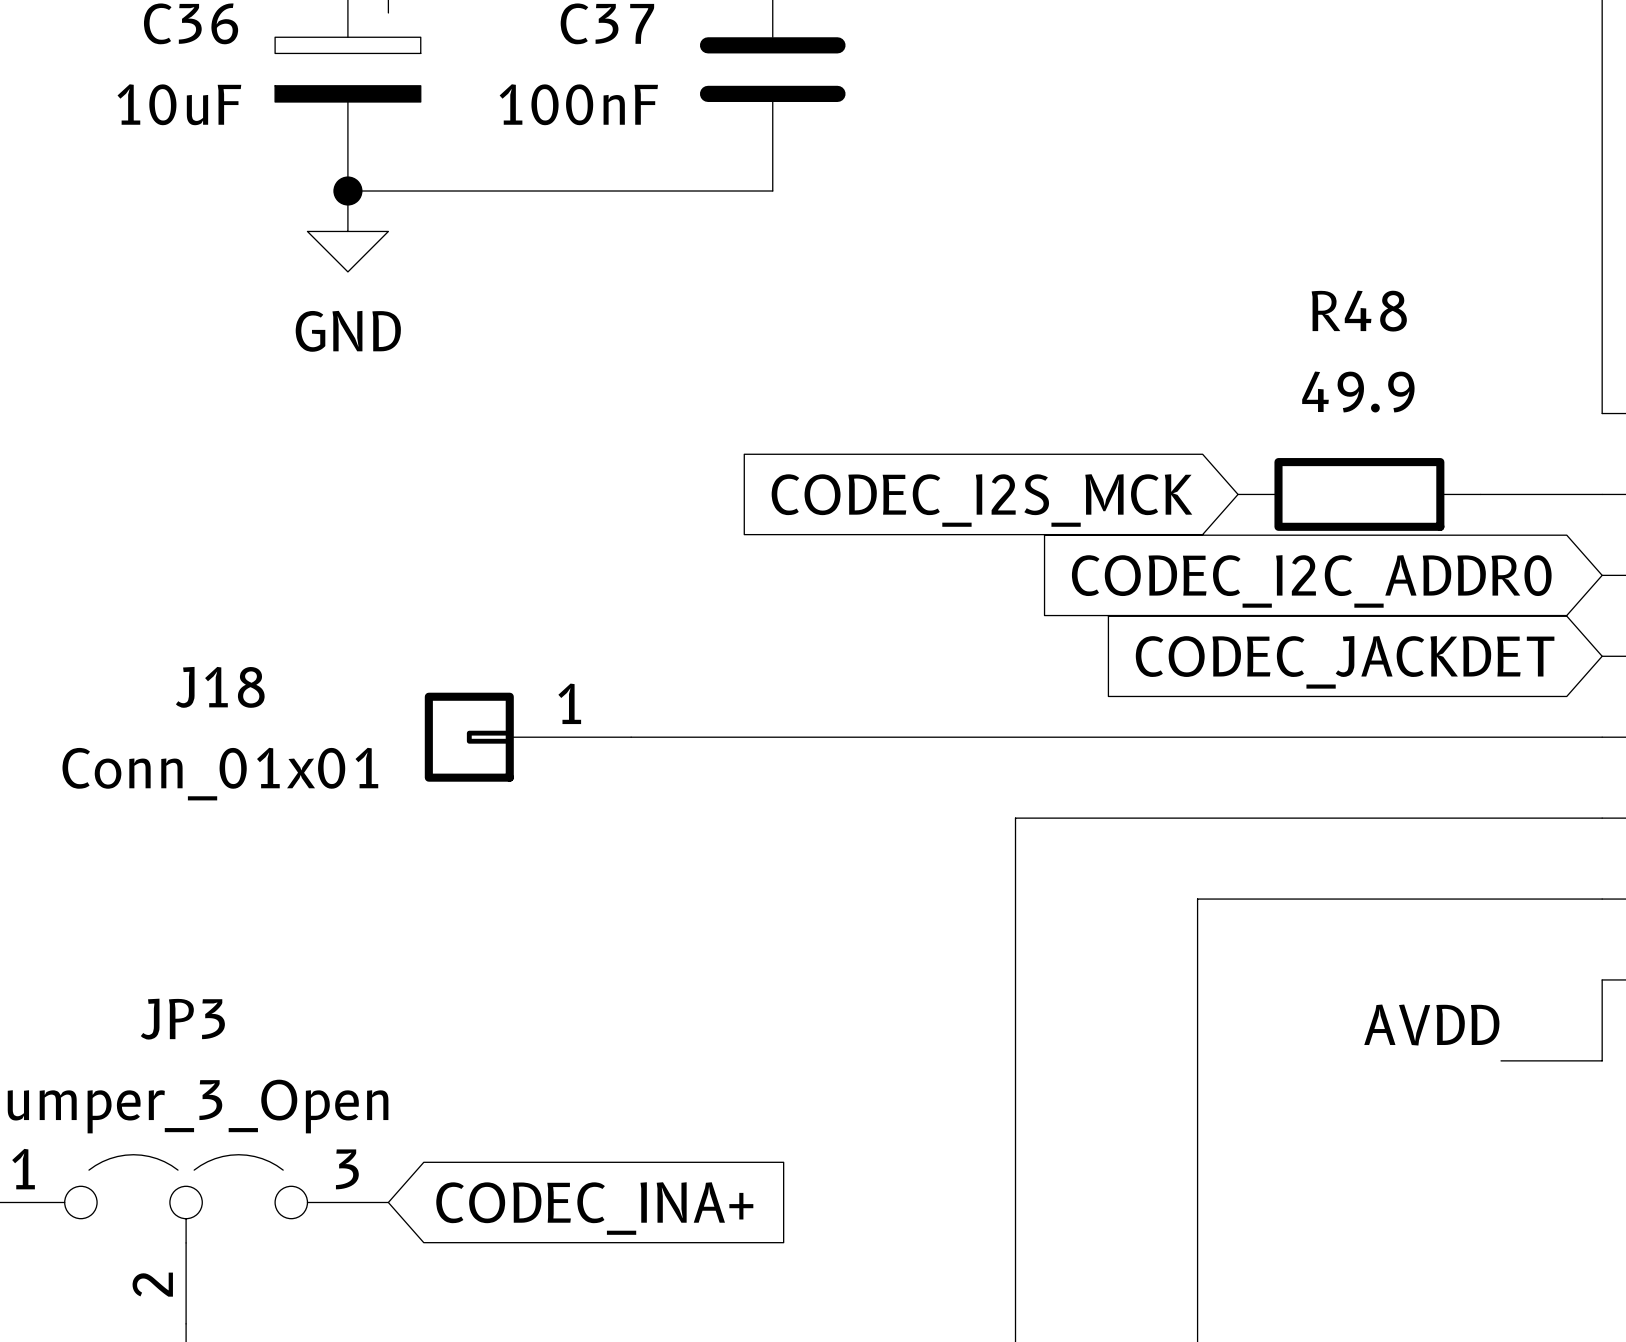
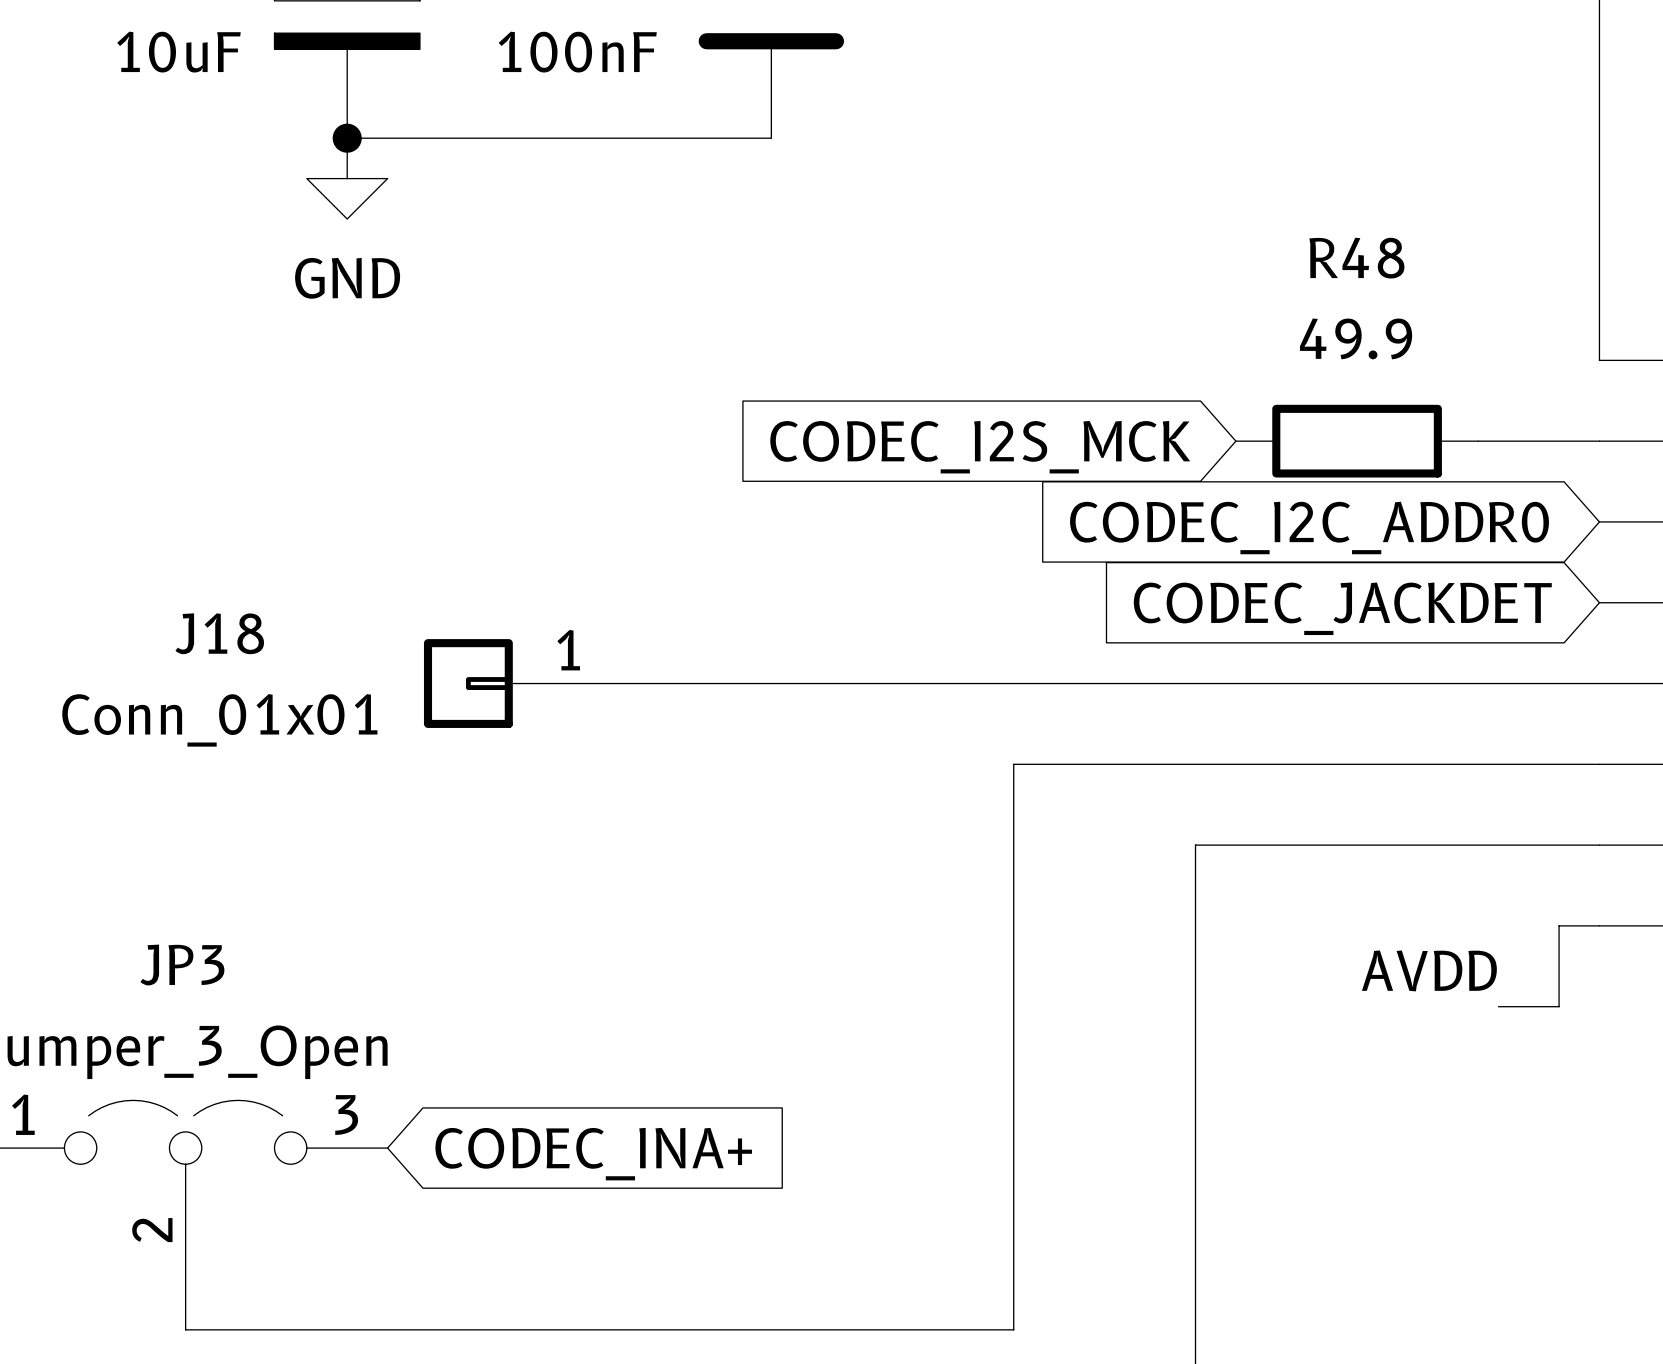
wire: (1602, 979) (1602, 1060) (1561, 1060) -> (1599, 925) (1559, 925) (1559, 1006)

